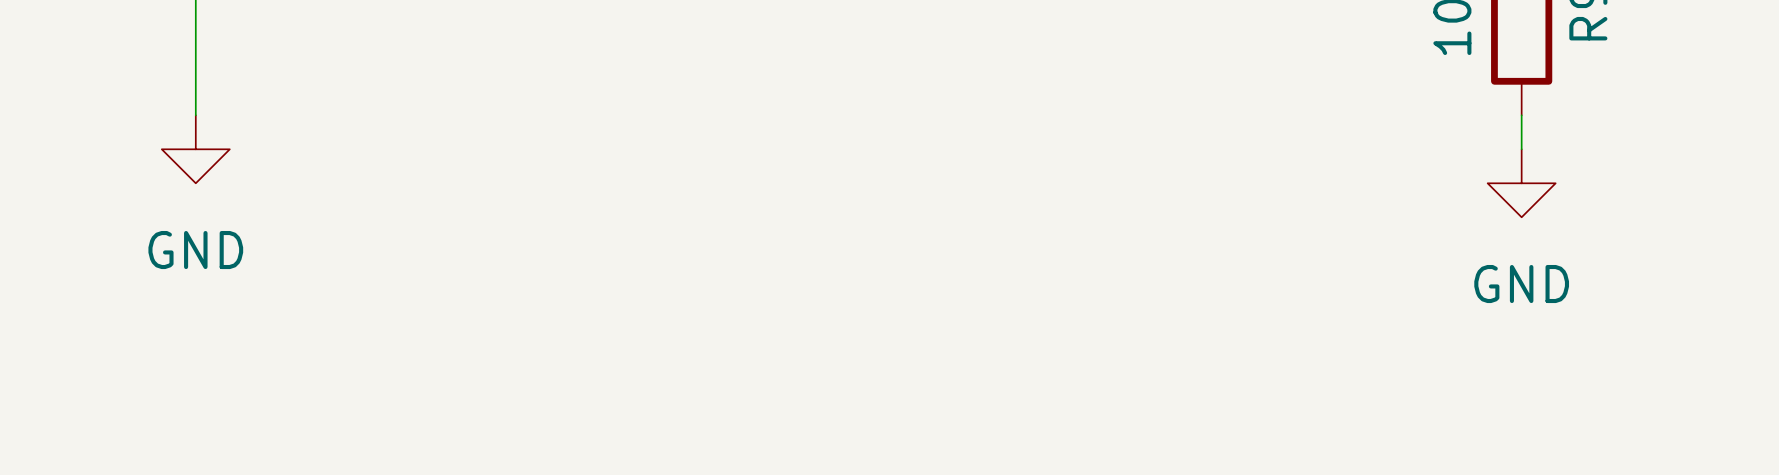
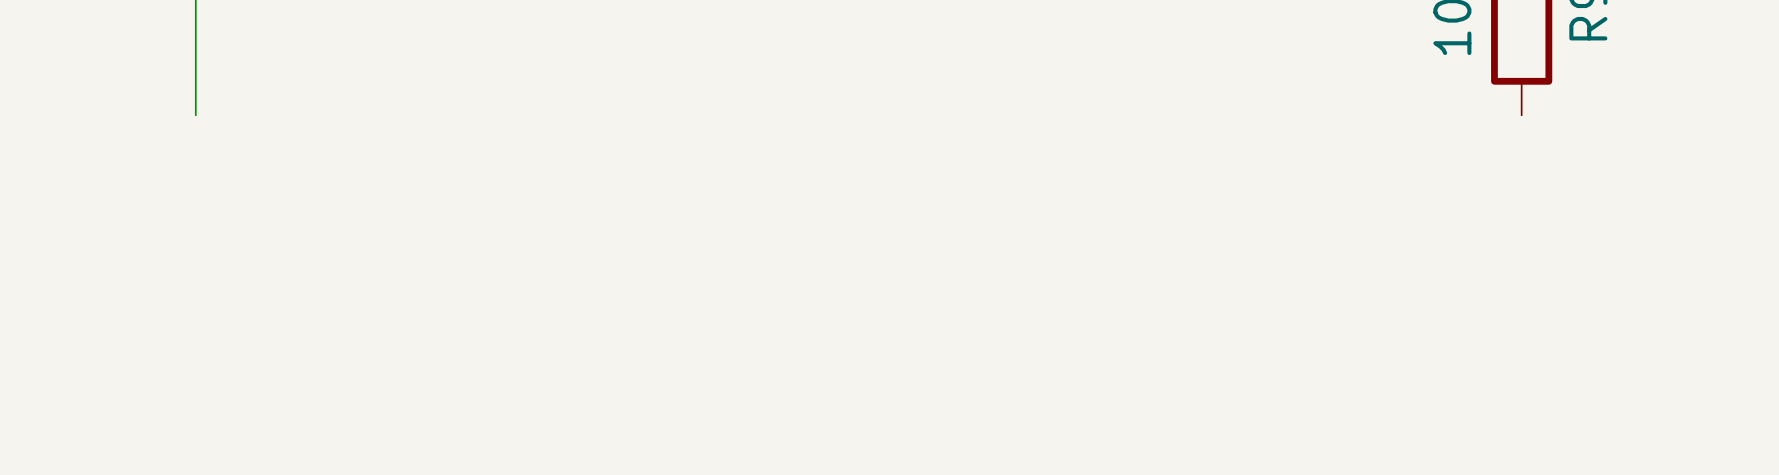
wire: (1521, 115) (1521, 149) -> none
power symbol: GND (195, 149) -> none
power symbol: GND (1521, 183) -> none

